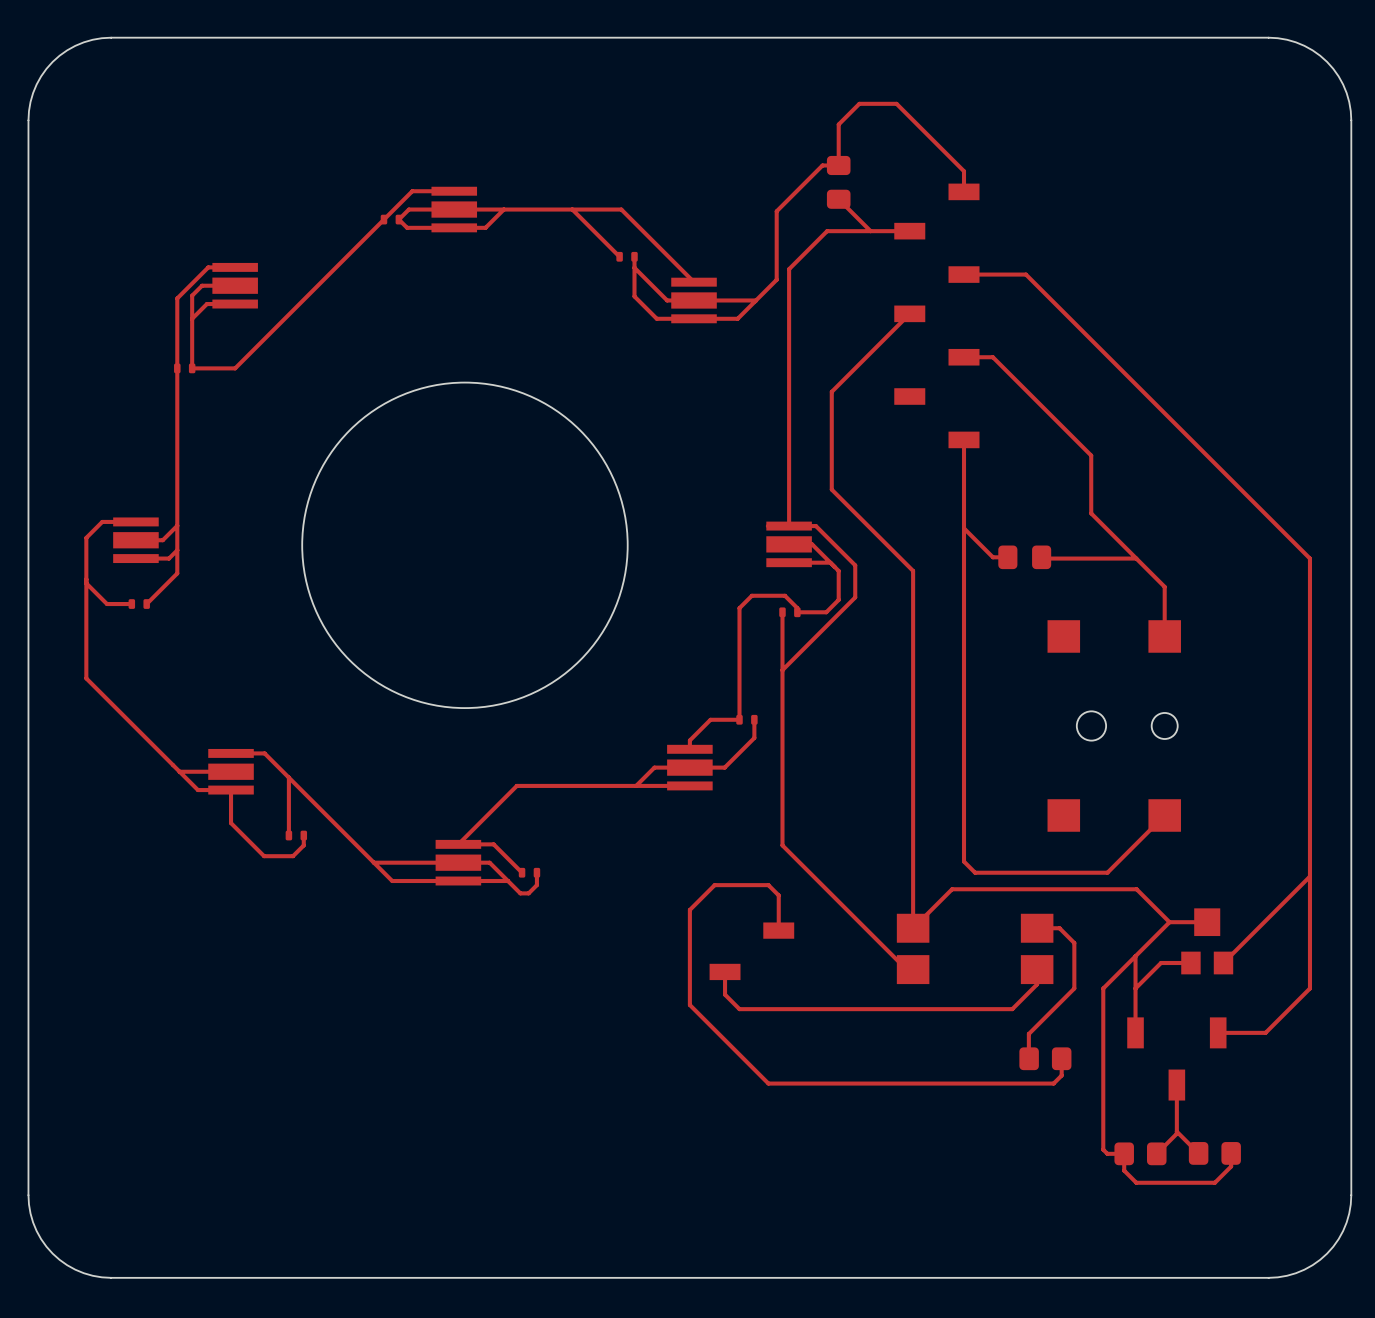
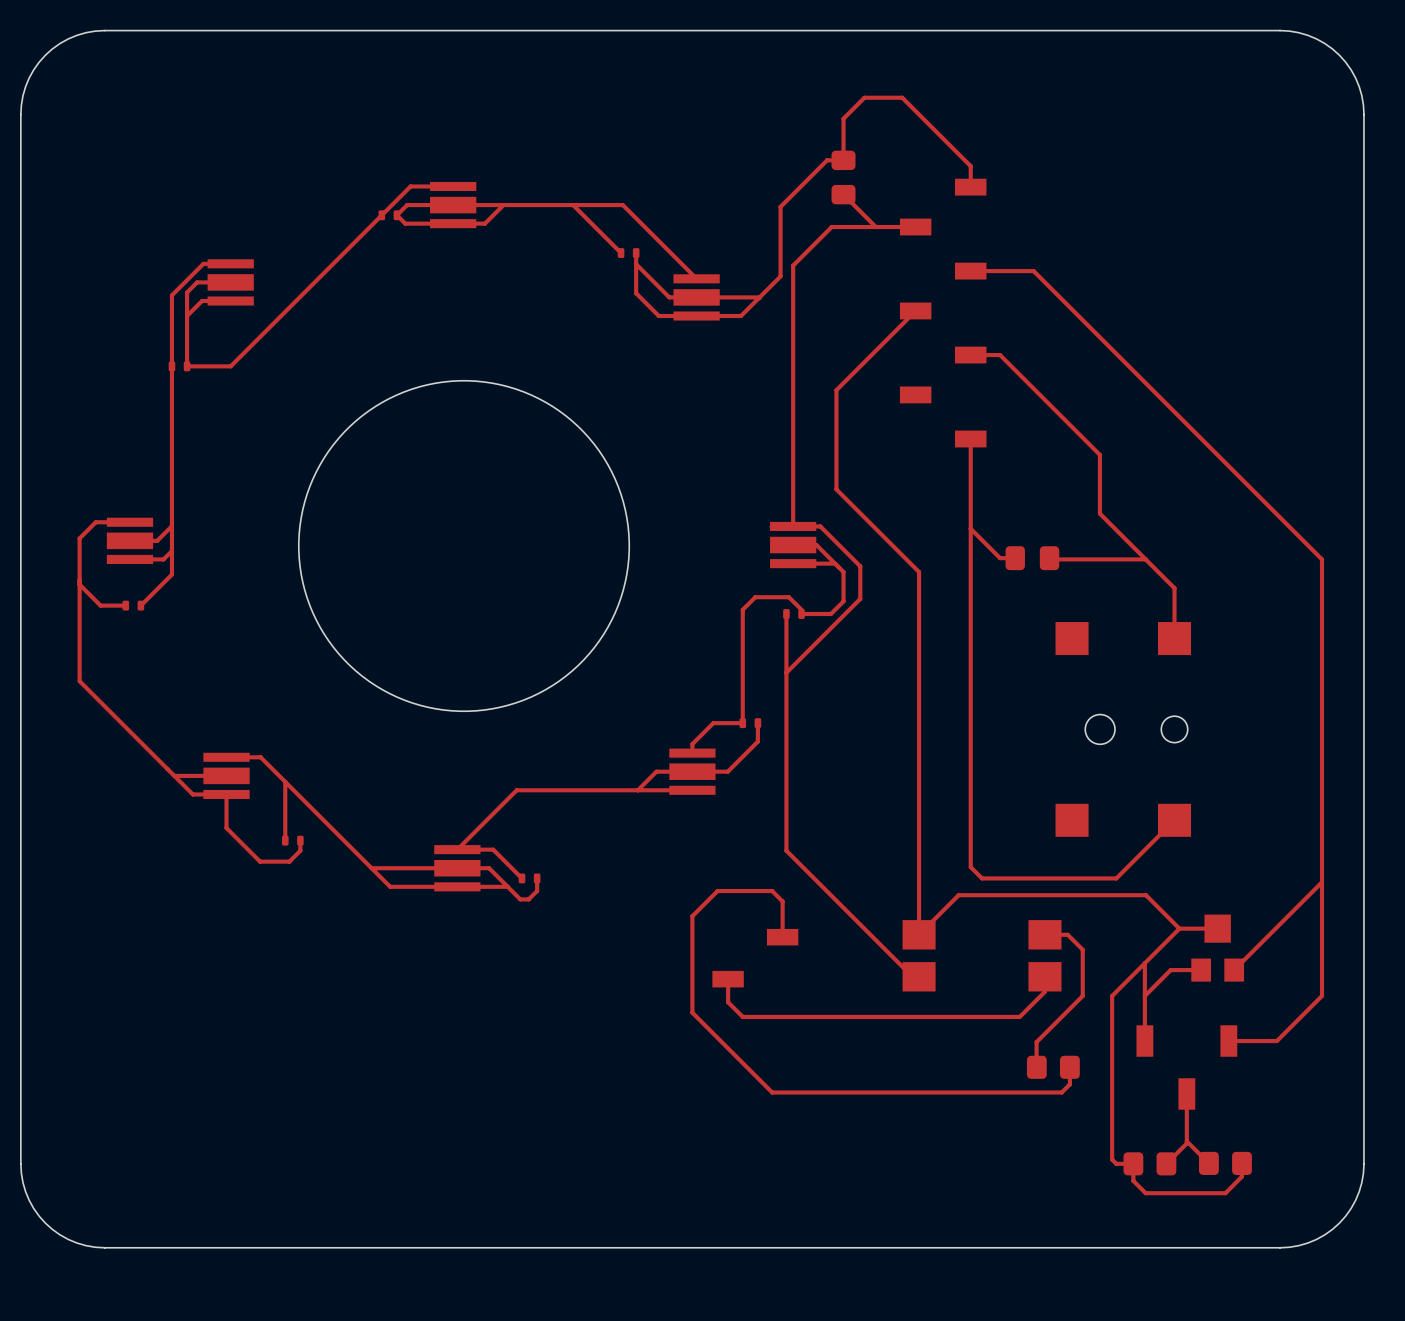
board edge: (1351, 1153) (1350, 1204) (1346, 1222) (1338, 1239) (1327, 1253) (1312, 1265) (1287, 1275) (1268, 1277) (101, 1277) (83, 1273) (67, 1265) (52, 1253) (41, 1239) (33, 1222) (28, 1204) (28, 1153) -> (1363, 1163) (1361, 1182) (1355, 1200) (1339, 1223) (1324, 1234) (1307, 1243) (1280, 1247) (95, 1247) (68, 1239) (52, 1229) (39, 1216) (25, 1191) (20, 1163)

